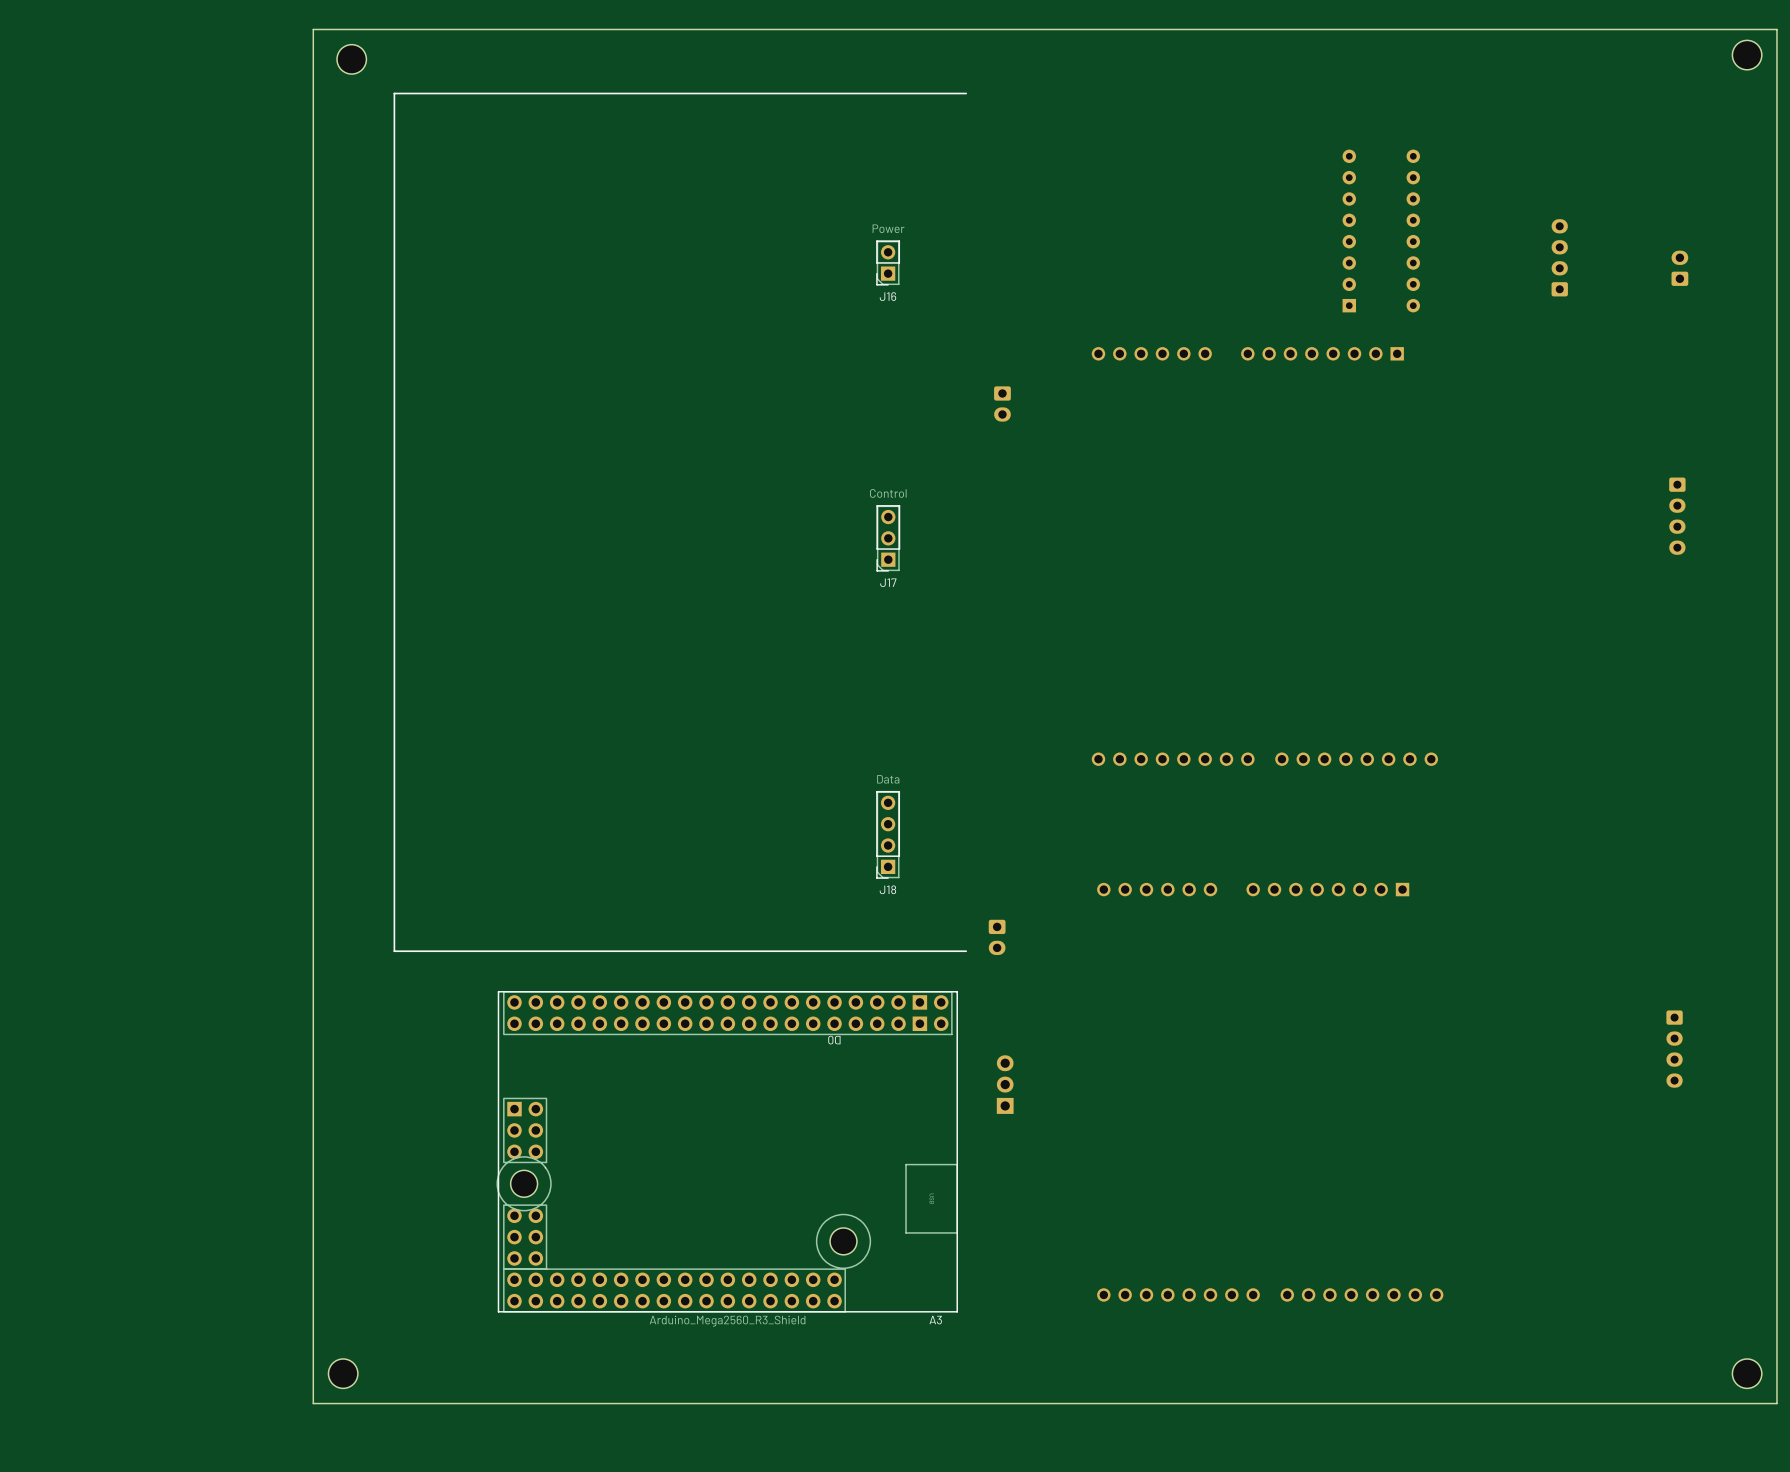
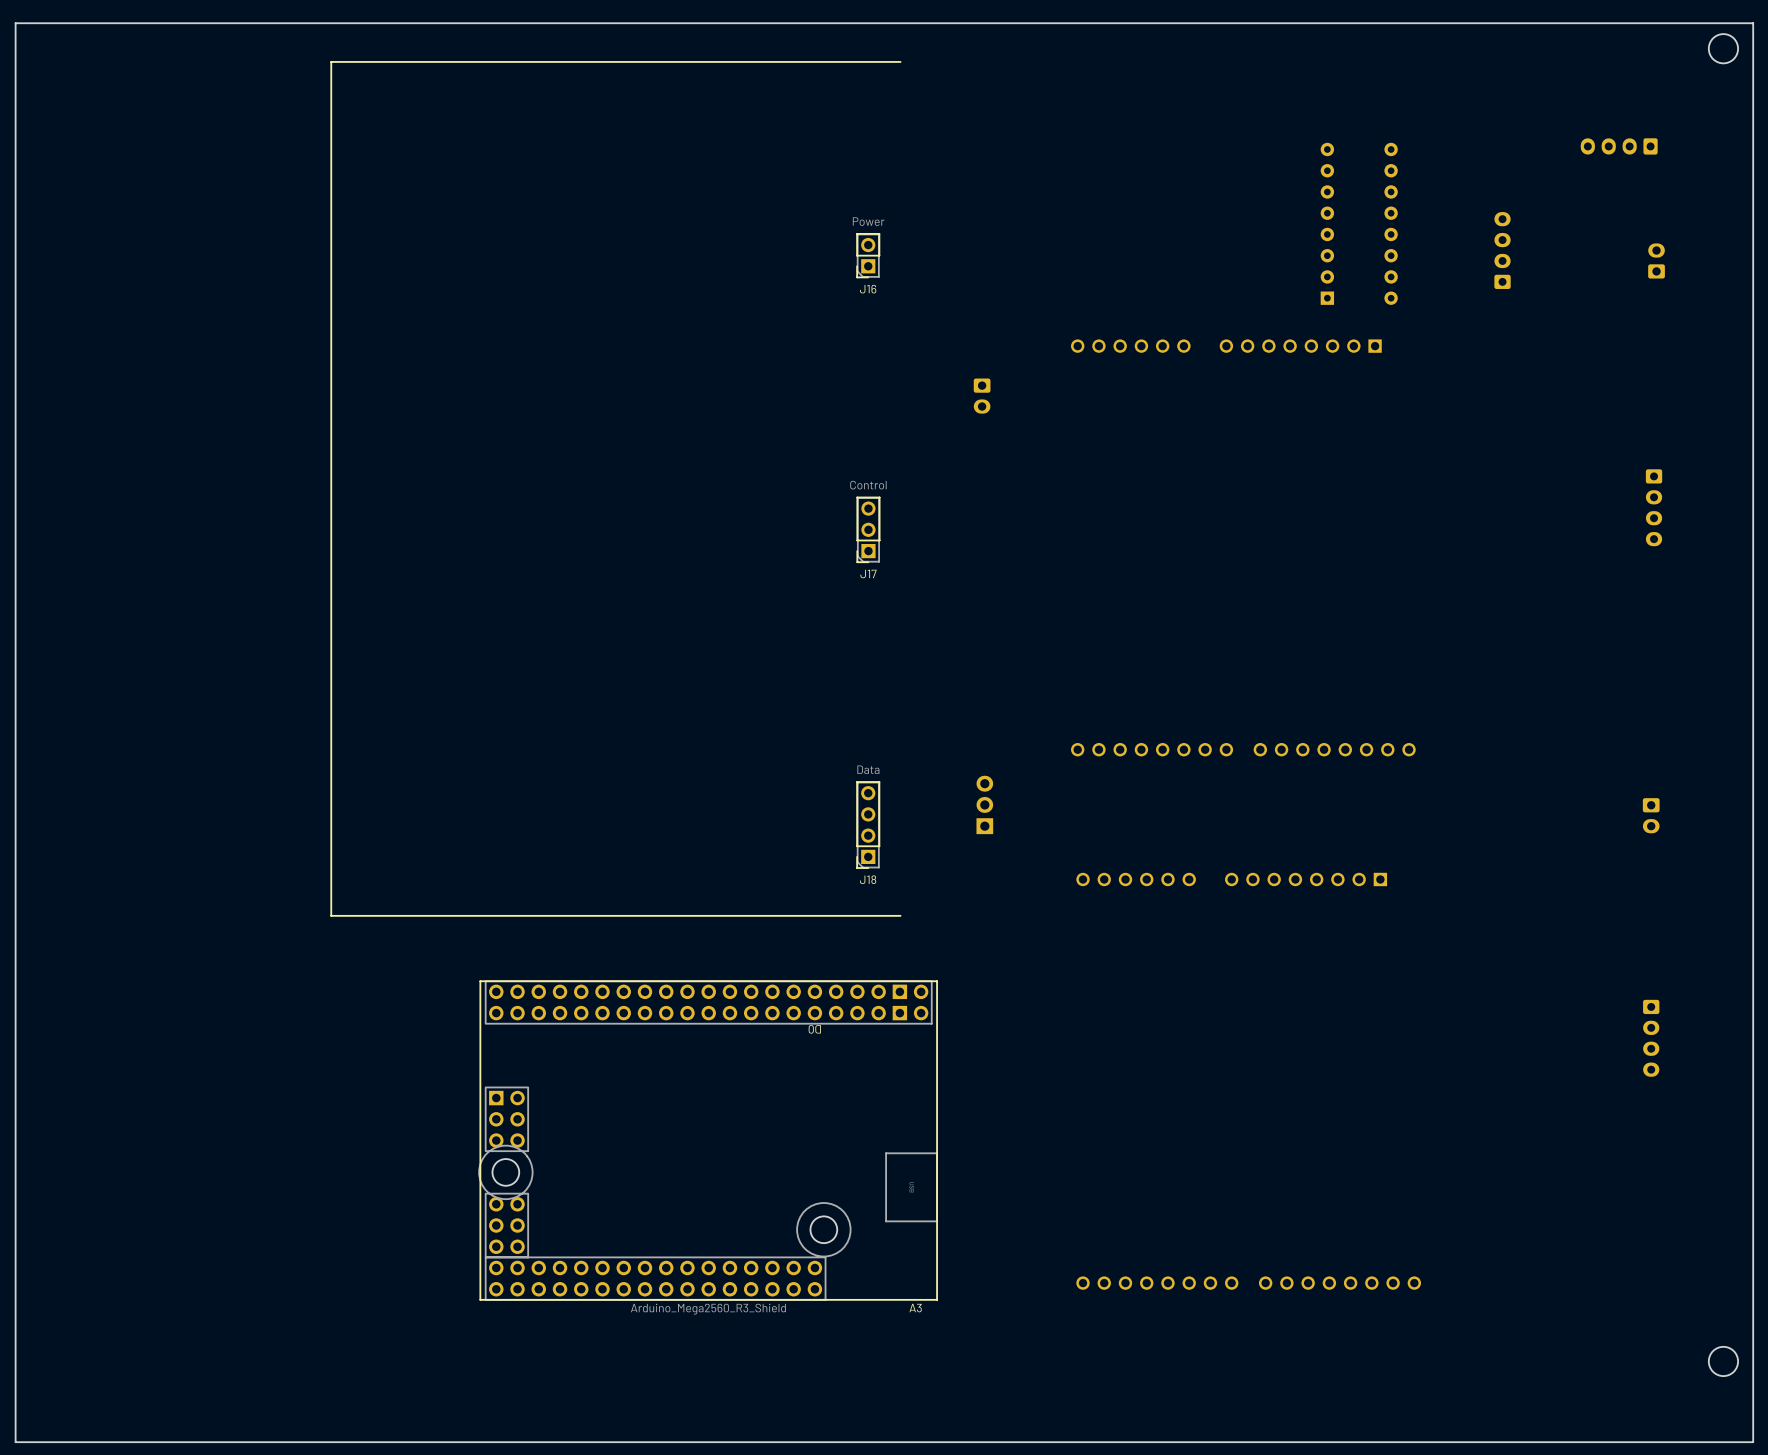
board edge: (313, 29) (313, 1403) (1776, 1403) -> (296, 23) (15, 23) (15, 1442) (1753, 1442) (1753, 1391)
part: (351, 59) -> none
line: (966, 93) (394, 93) (394, 951) (966, 951) -> (900, 61) (331, 61) (331, 915) (900, 915)
part: none -> (1619, 146)
part position: (1559, 257) -> (1502, 250)
part: none -> (984, 804)
part: none -> (1651, 815)
part: (997, 937) -> none
part: (1005, 1084) -> none
part: (343, 1373) -> none

